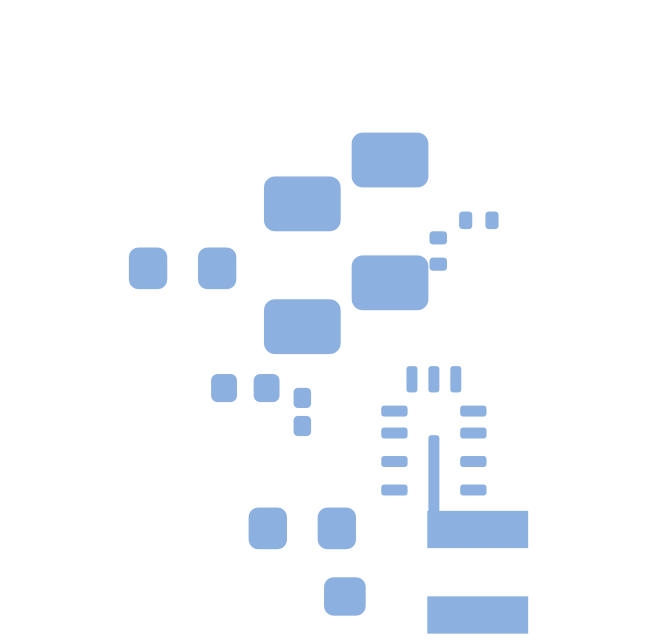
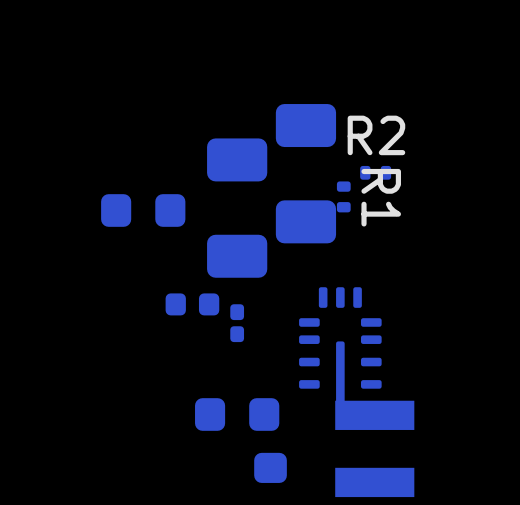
R2 name: none -> R2 (376, 135)
R1 name: none -> R1 (381, 197)

